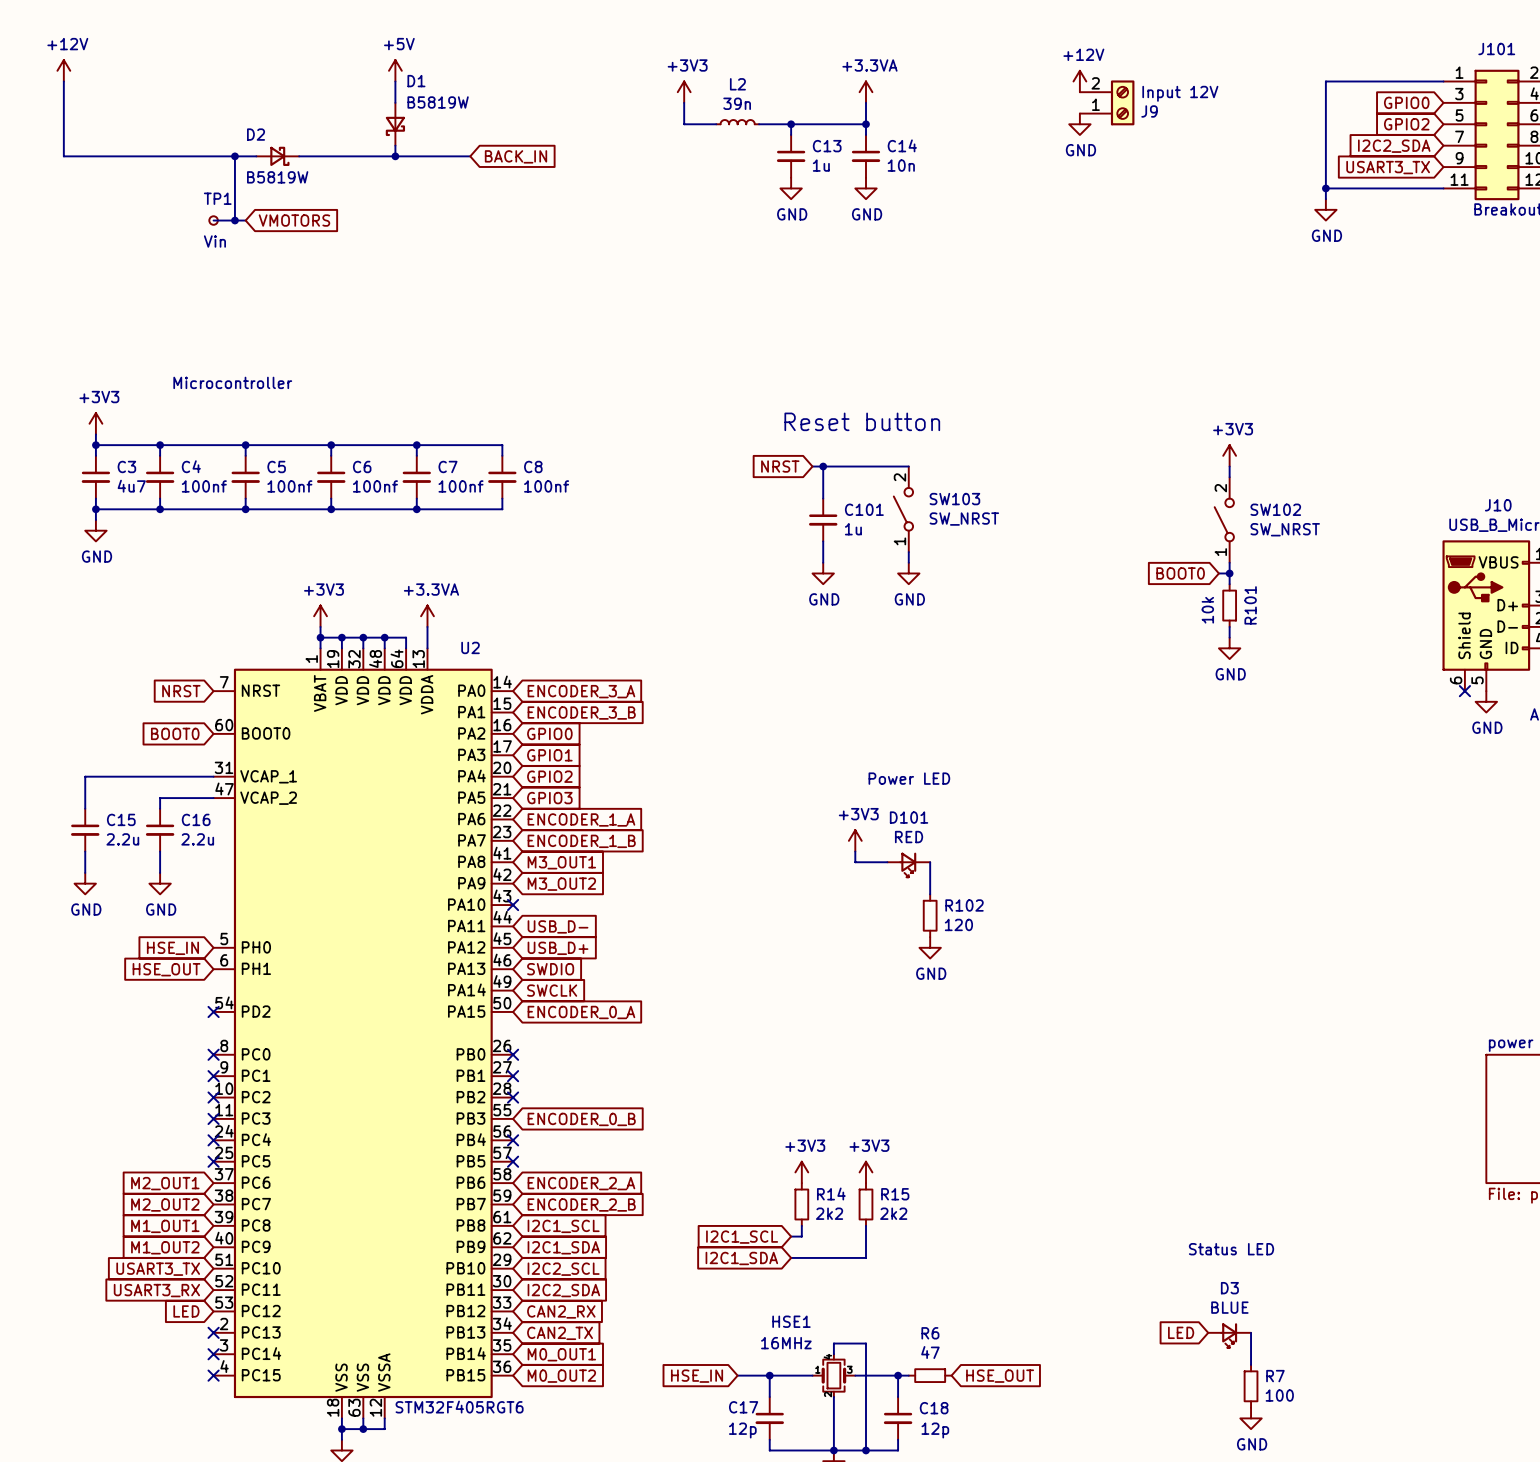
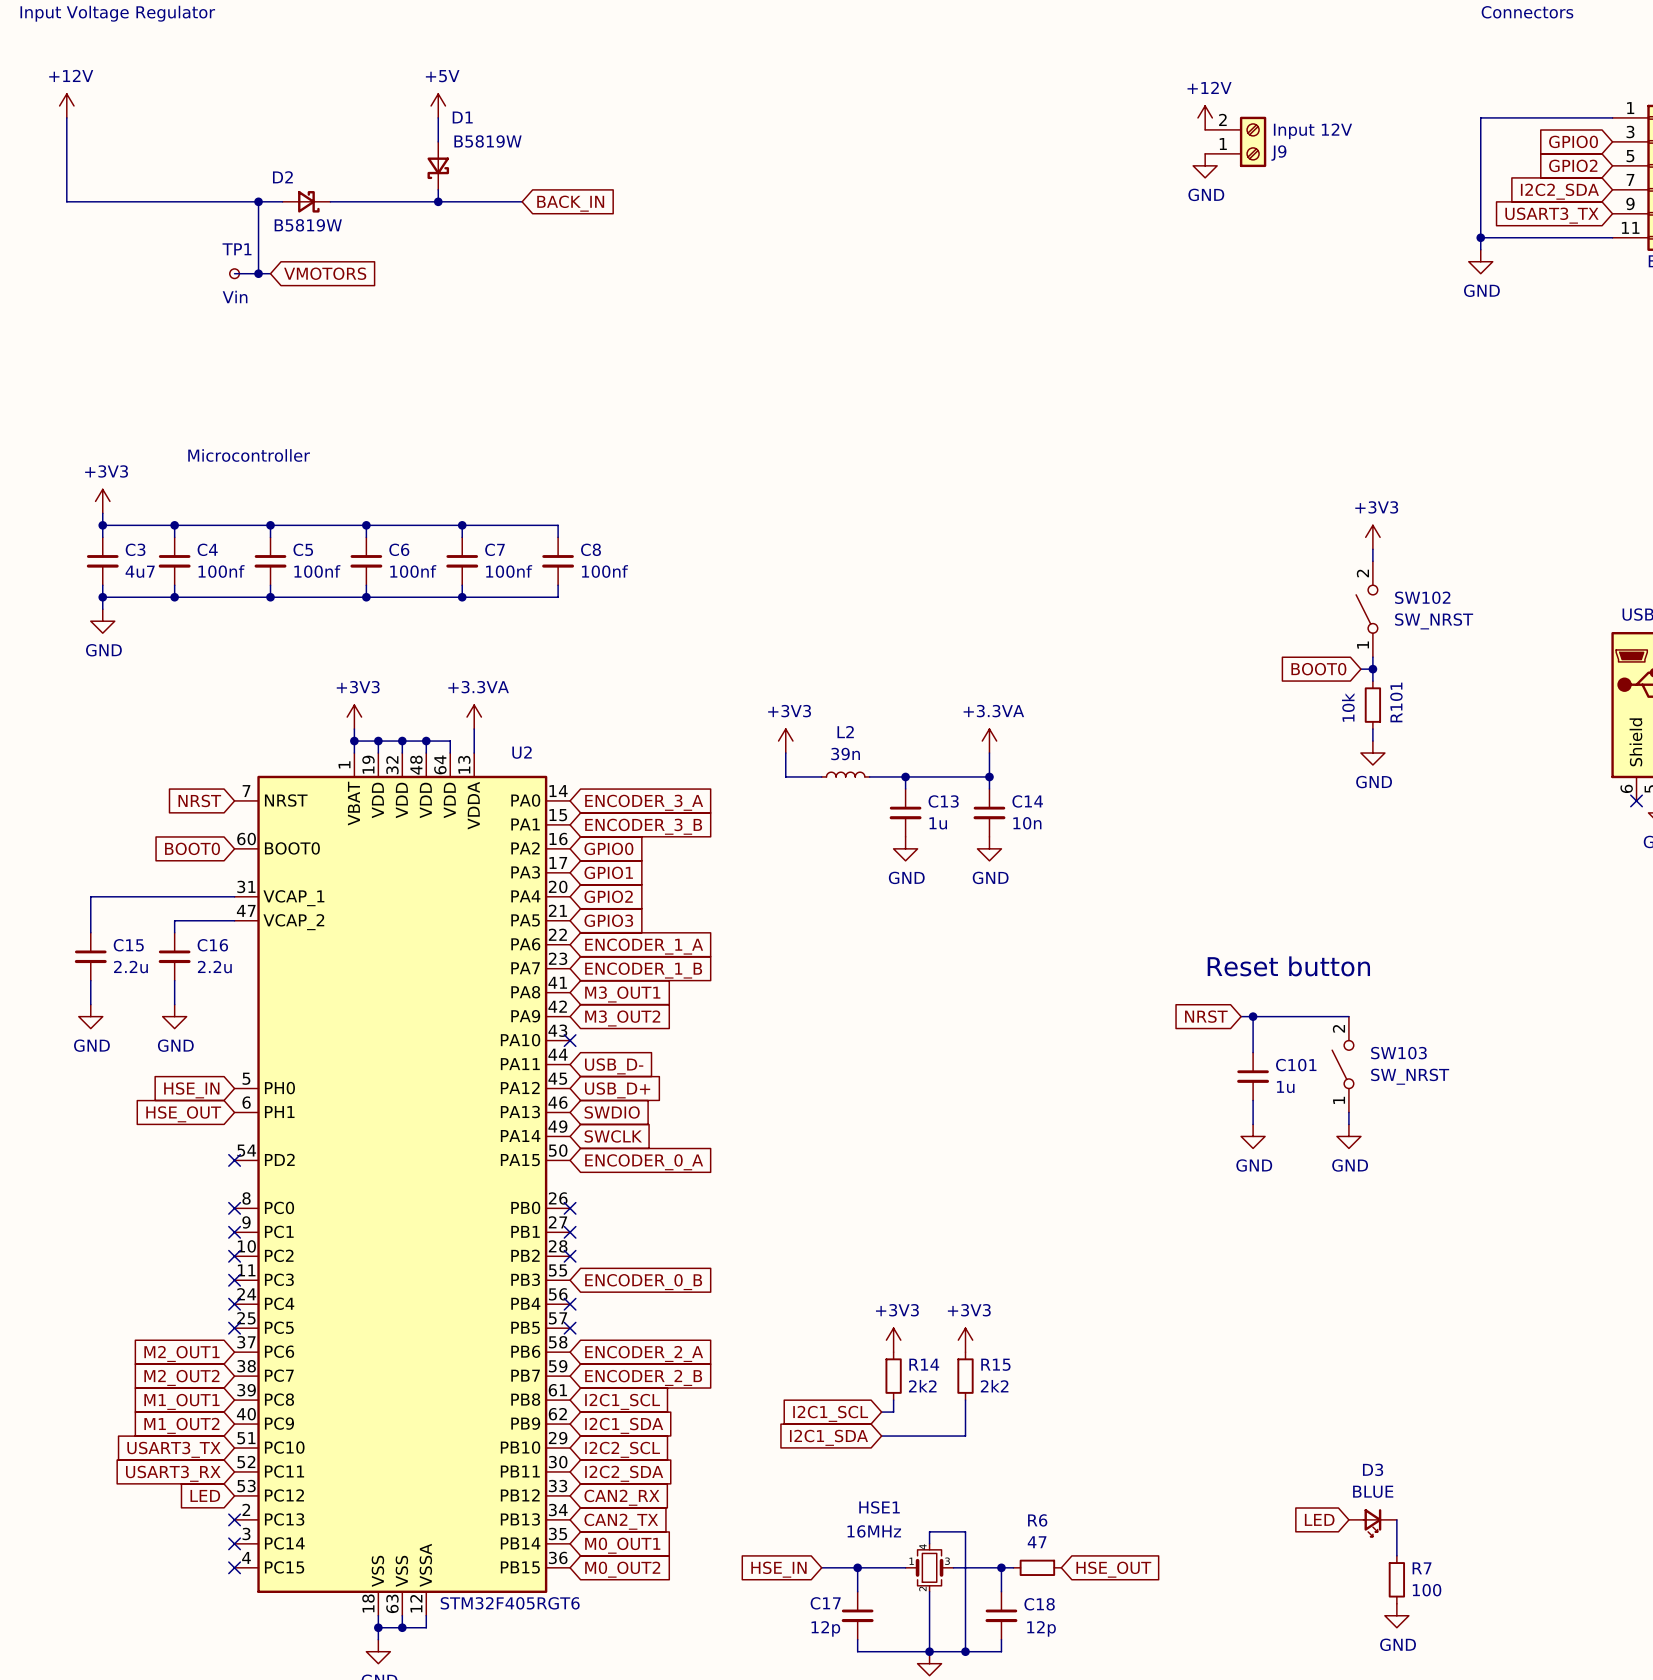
power symbol: +3V3 (684, 92) -> none
power symbol: +3.3VA (866, 92) -> none
wire: (684, 102) (684, 124) (716, 124) -> none
wire: (866, 102) (866, 134) -> none
L2 position: (737, 122) -> (845, 774)
wire: (759, 124) (866, 124) -> none
wire: (791, 124) (791, 134) -> none
junction: (791, 124) -> none
junction: (866, 124) -> none
C13 position: (791, 156) -> (905, 812)
C14 position: (866, 156) -> (989, 812)
power symbol: GND (791, 188) -> none
power symbol: GND (866, 188) -> none
text: Reset button (862, 421) -> none
global label: NRST (780, 466) -> none
wire: (812, 466) (908, 466) -> none
wire: (823, 466) (823, 498) -> (989, 753) (989, 788)
junction: (823, 466) -> none
SW103 position: (903, 509) -> (1342, 1064)
C101 position: (823, 520) -> (1253, 1076)
wire: (823, 541) (823, 562) -> none
wire: (908, 552) (908, 562) -> (905, 776) (905, 788)
power symbol: GND (823, 573) -> none
power symbol: GND (908, 573) -> none
power symbol: none -> +3V3 (785, 741)
power symbol: none -> +3.3VA (989, 741)
wire: none -> (785, 753) (785, 776) (821, 776)
wire: none -> (869, 776) (989, 776)
junction: none -> (905, 776)
junction: none -> (989, 776)
power symbol: none -> GND (905, 848)
power symbol: none -> GND (989, 848)
text: Power LED (909, 778) -> none
text: none -> Reset button (1288, 966)
power symbol: +3V3 (855, 840) -> none
wire: (855, 851) (855, 862) (887, 862) -> none
wire: (930, 862) (930, 894) -> (1253, 1016) (1253, 1052)
D101: RED (908, 864) -> none
global label: none -> NRST (1206, 1016)
wire: none -> (1241, 1016) (1348, 1016)
junction: none -> (1253, 1016)
R102: 120 (930, 915) -> none
power symbol: GND (930, 947) -> none
wire: none -> (1253, 1100) (1253, 1124)
wire: none -> (1348, 1112) (1348, 1124)
power symbol: none -> GND (1253, 1136)
power symbol: none -> GND (1348, 1136)
text: Status LED (1231, 1249) -> none

